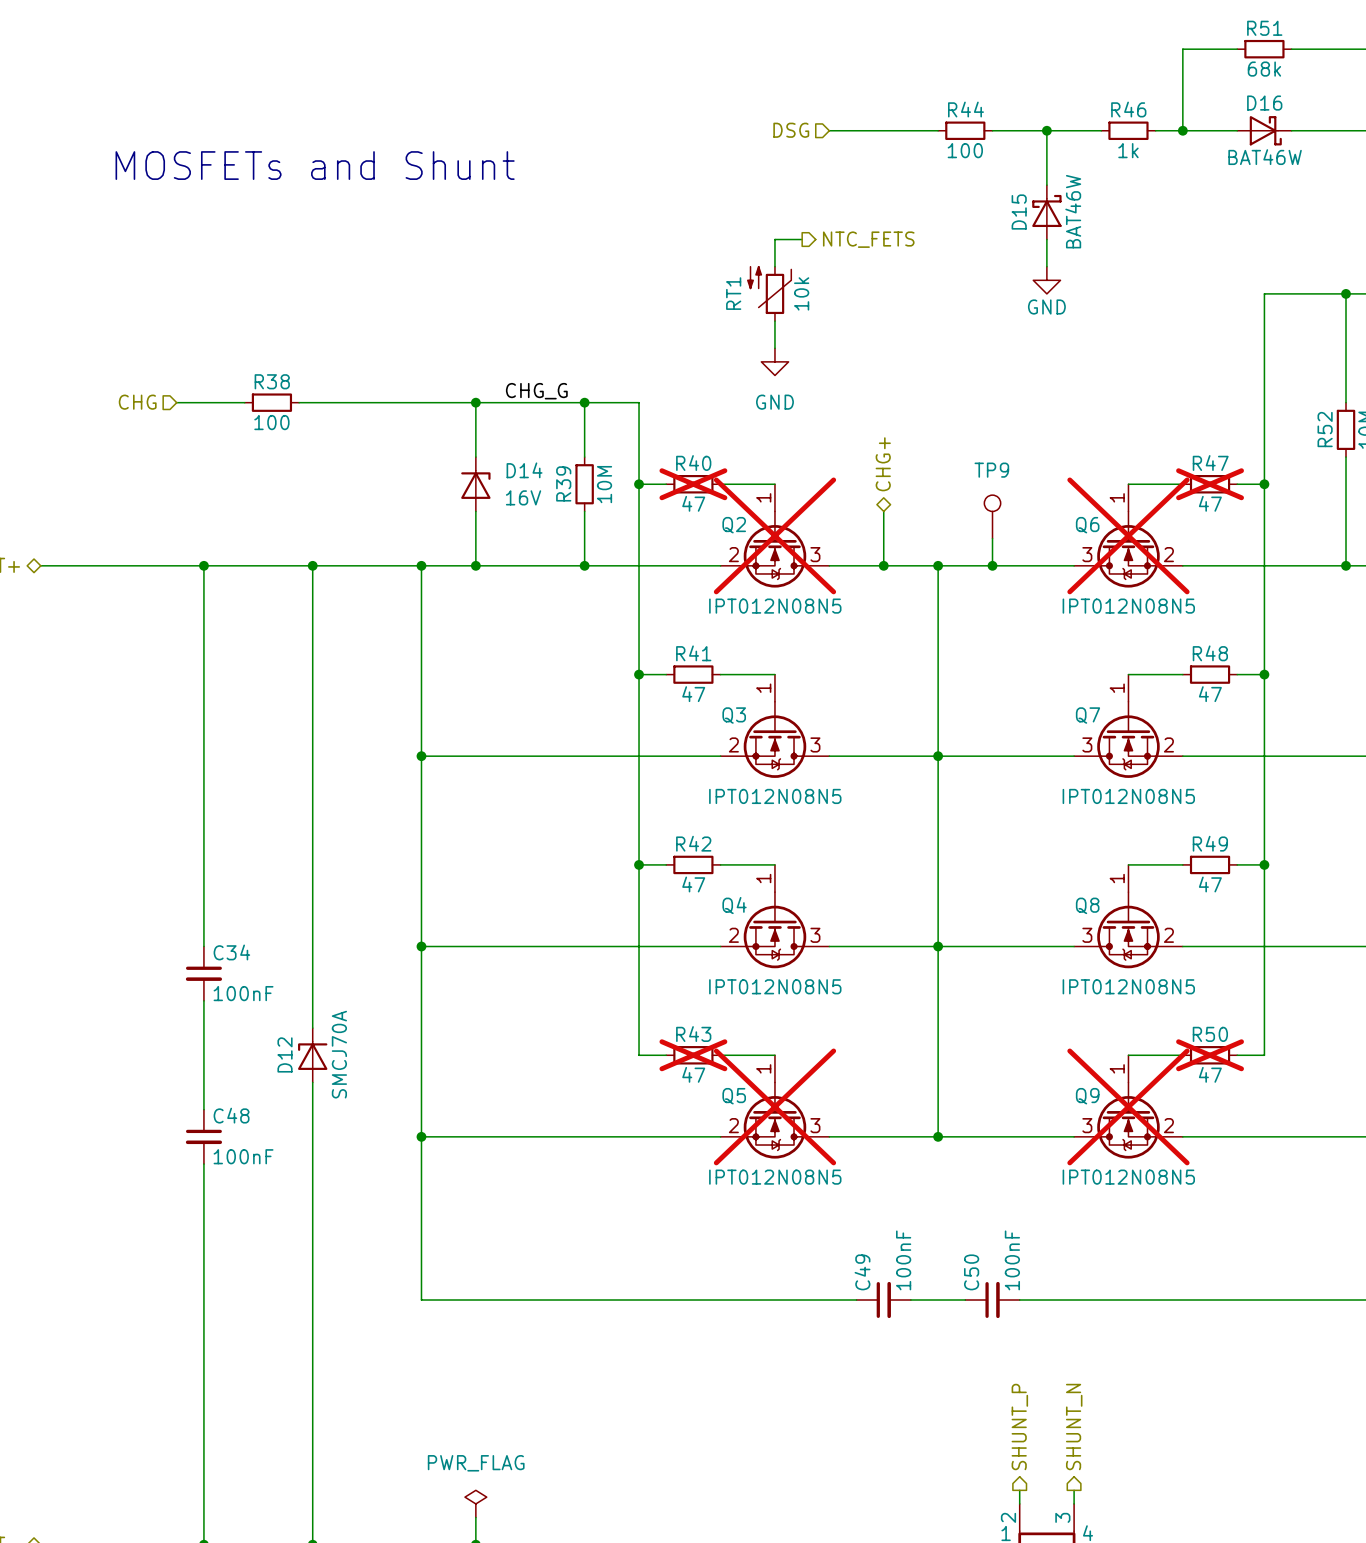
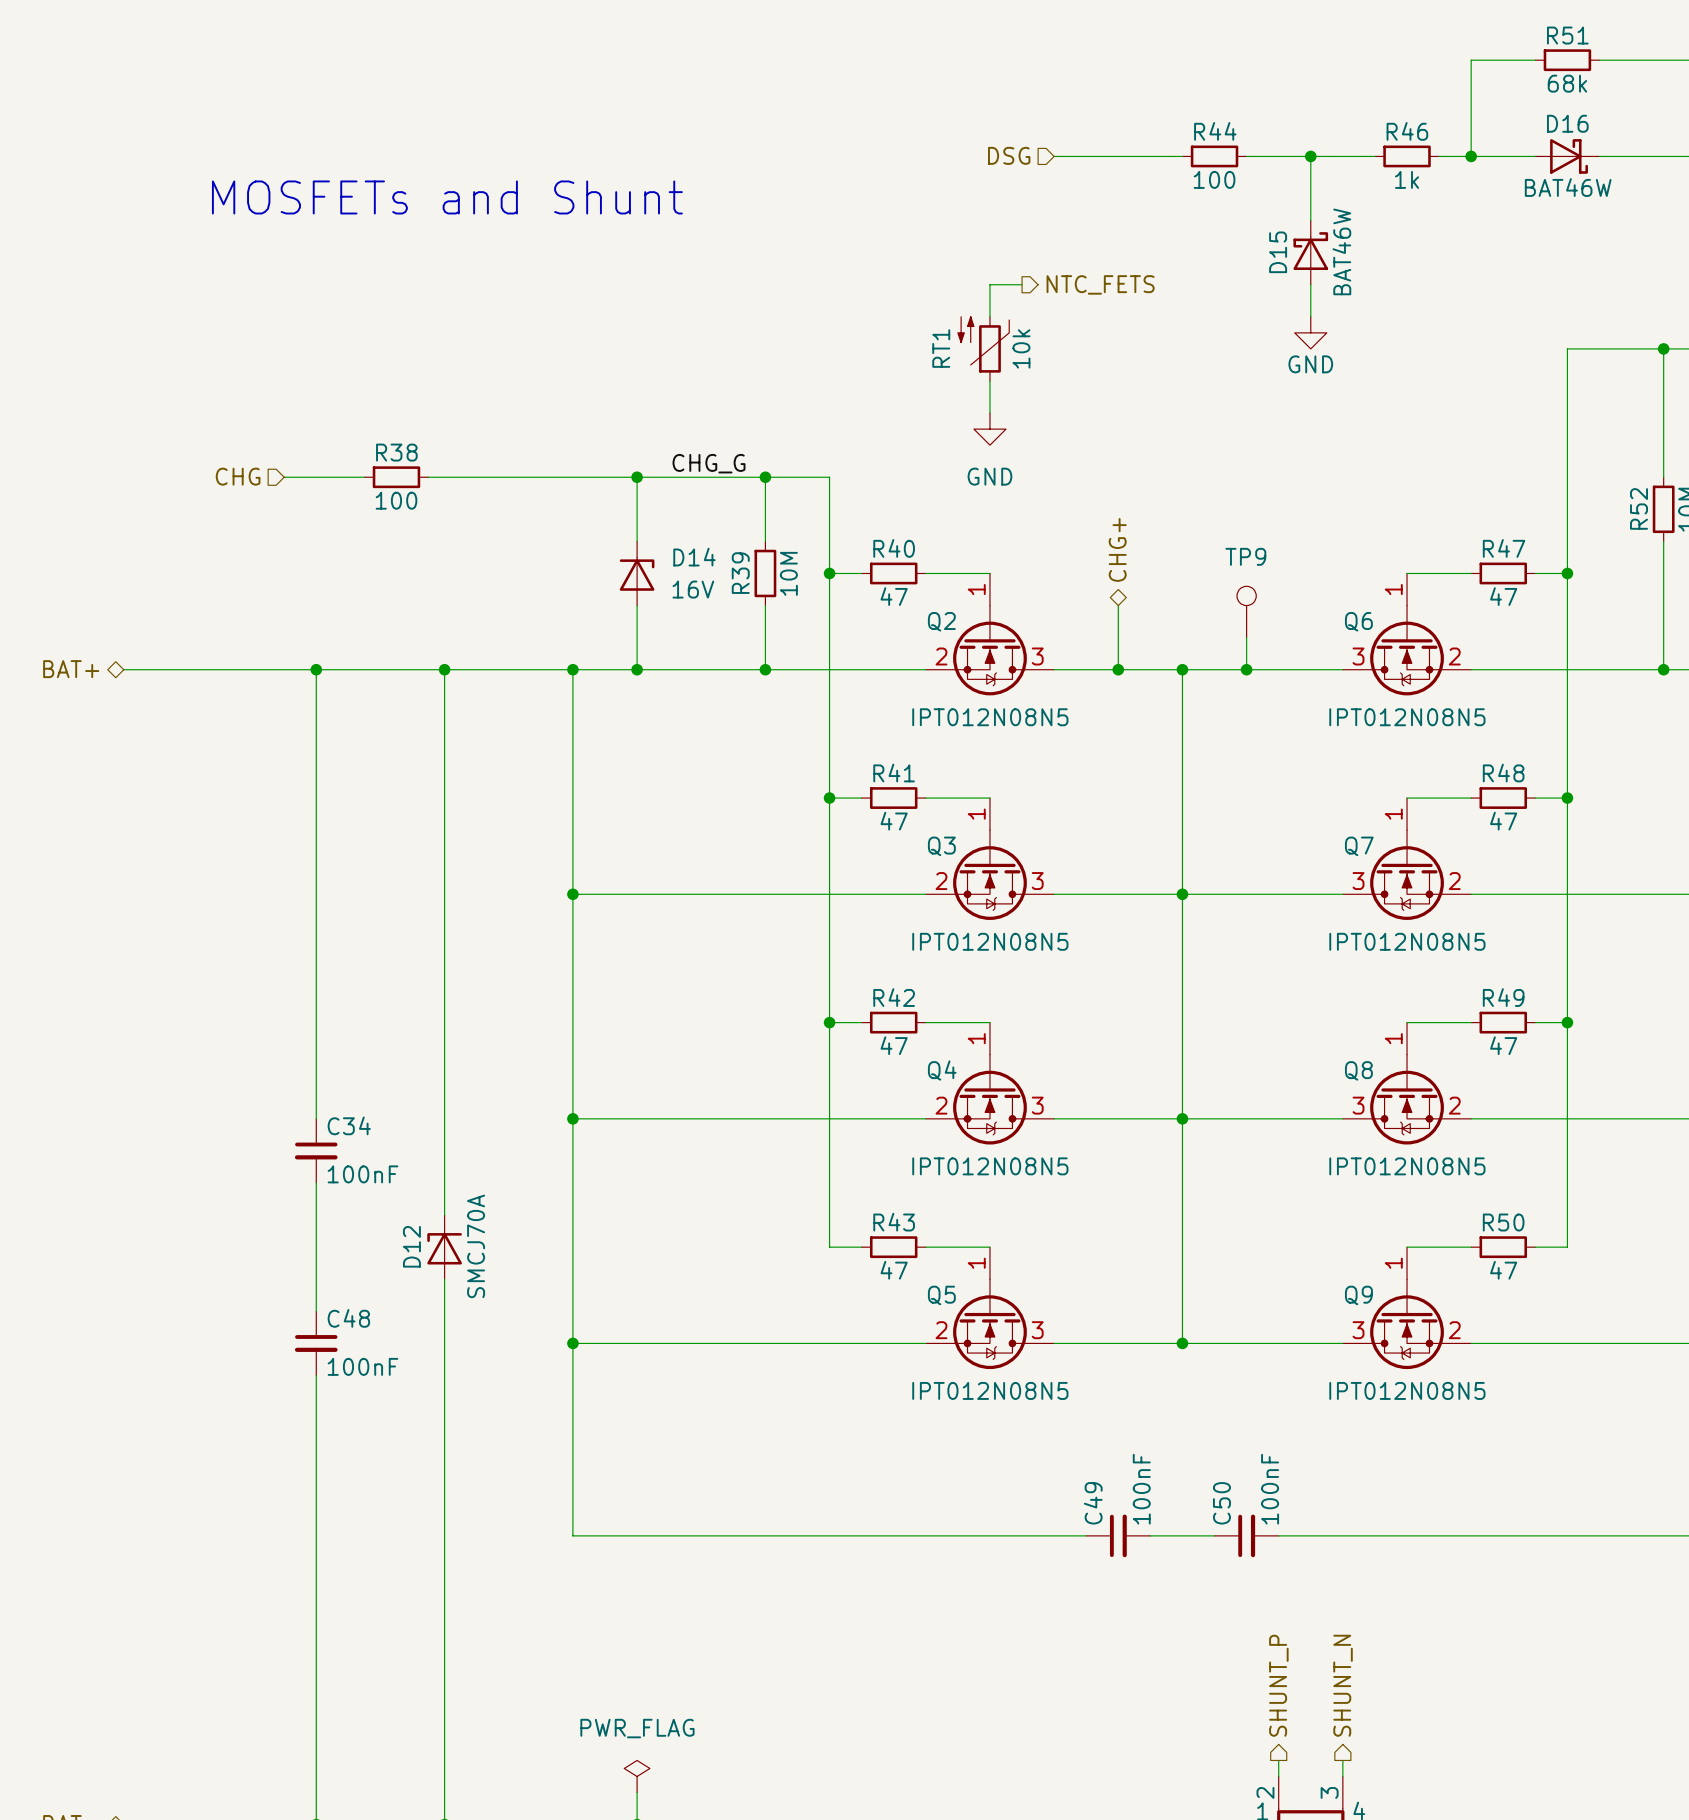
R40 do-not-place cross: (693, 484) -> none
R47 do-not-place cross: (1210, 484) -> none
Q2 do-not-place cross: (774, 535) -> none
Q6 do-not-place cross: (1128, 535) -> none
R43 do-not-place cross: (693, 1055) -> none
R50 do-not-place cross: (1210, 1055) -> none
Q5 do-not-place cross: (774, 1106) -> none
Q9 do-not-place cross: (1128, 1106) -> none

